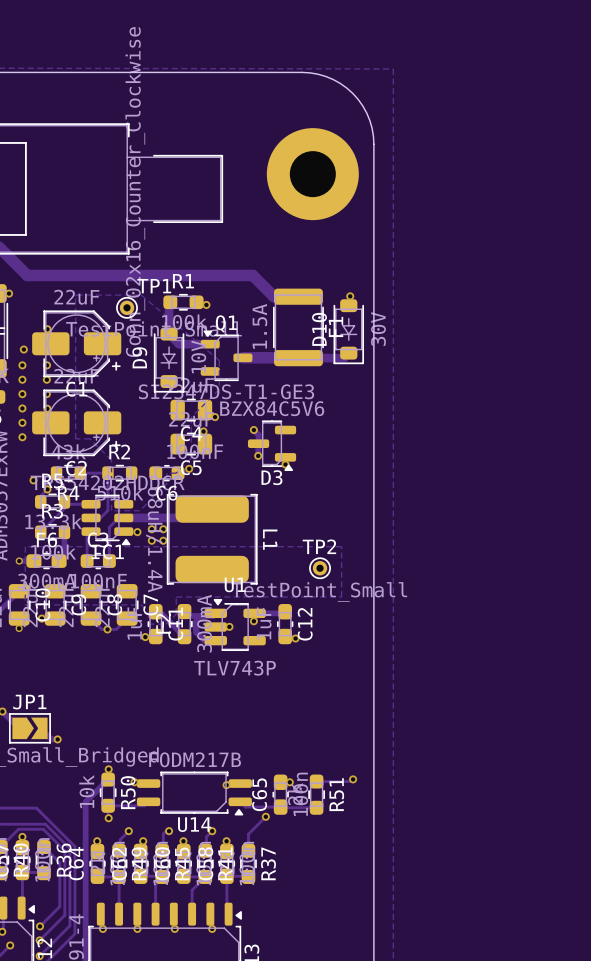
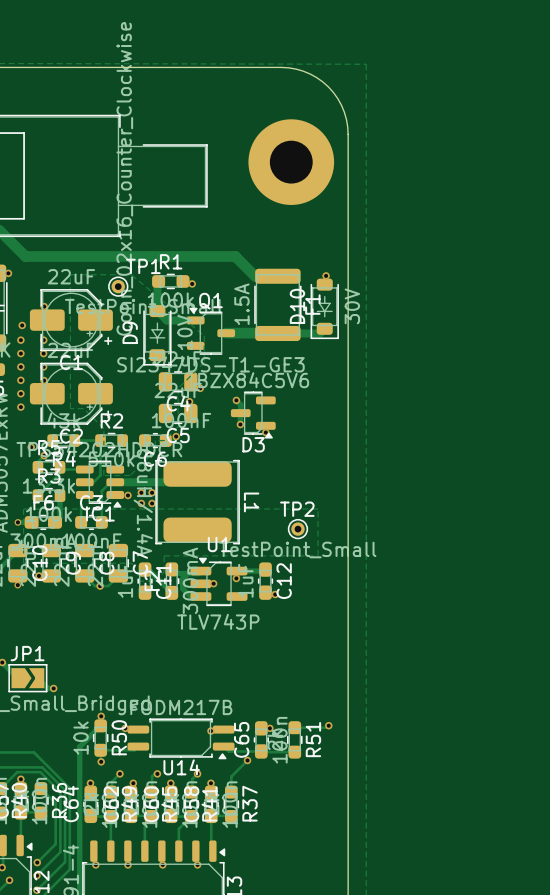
via: (145, 637) -> none

